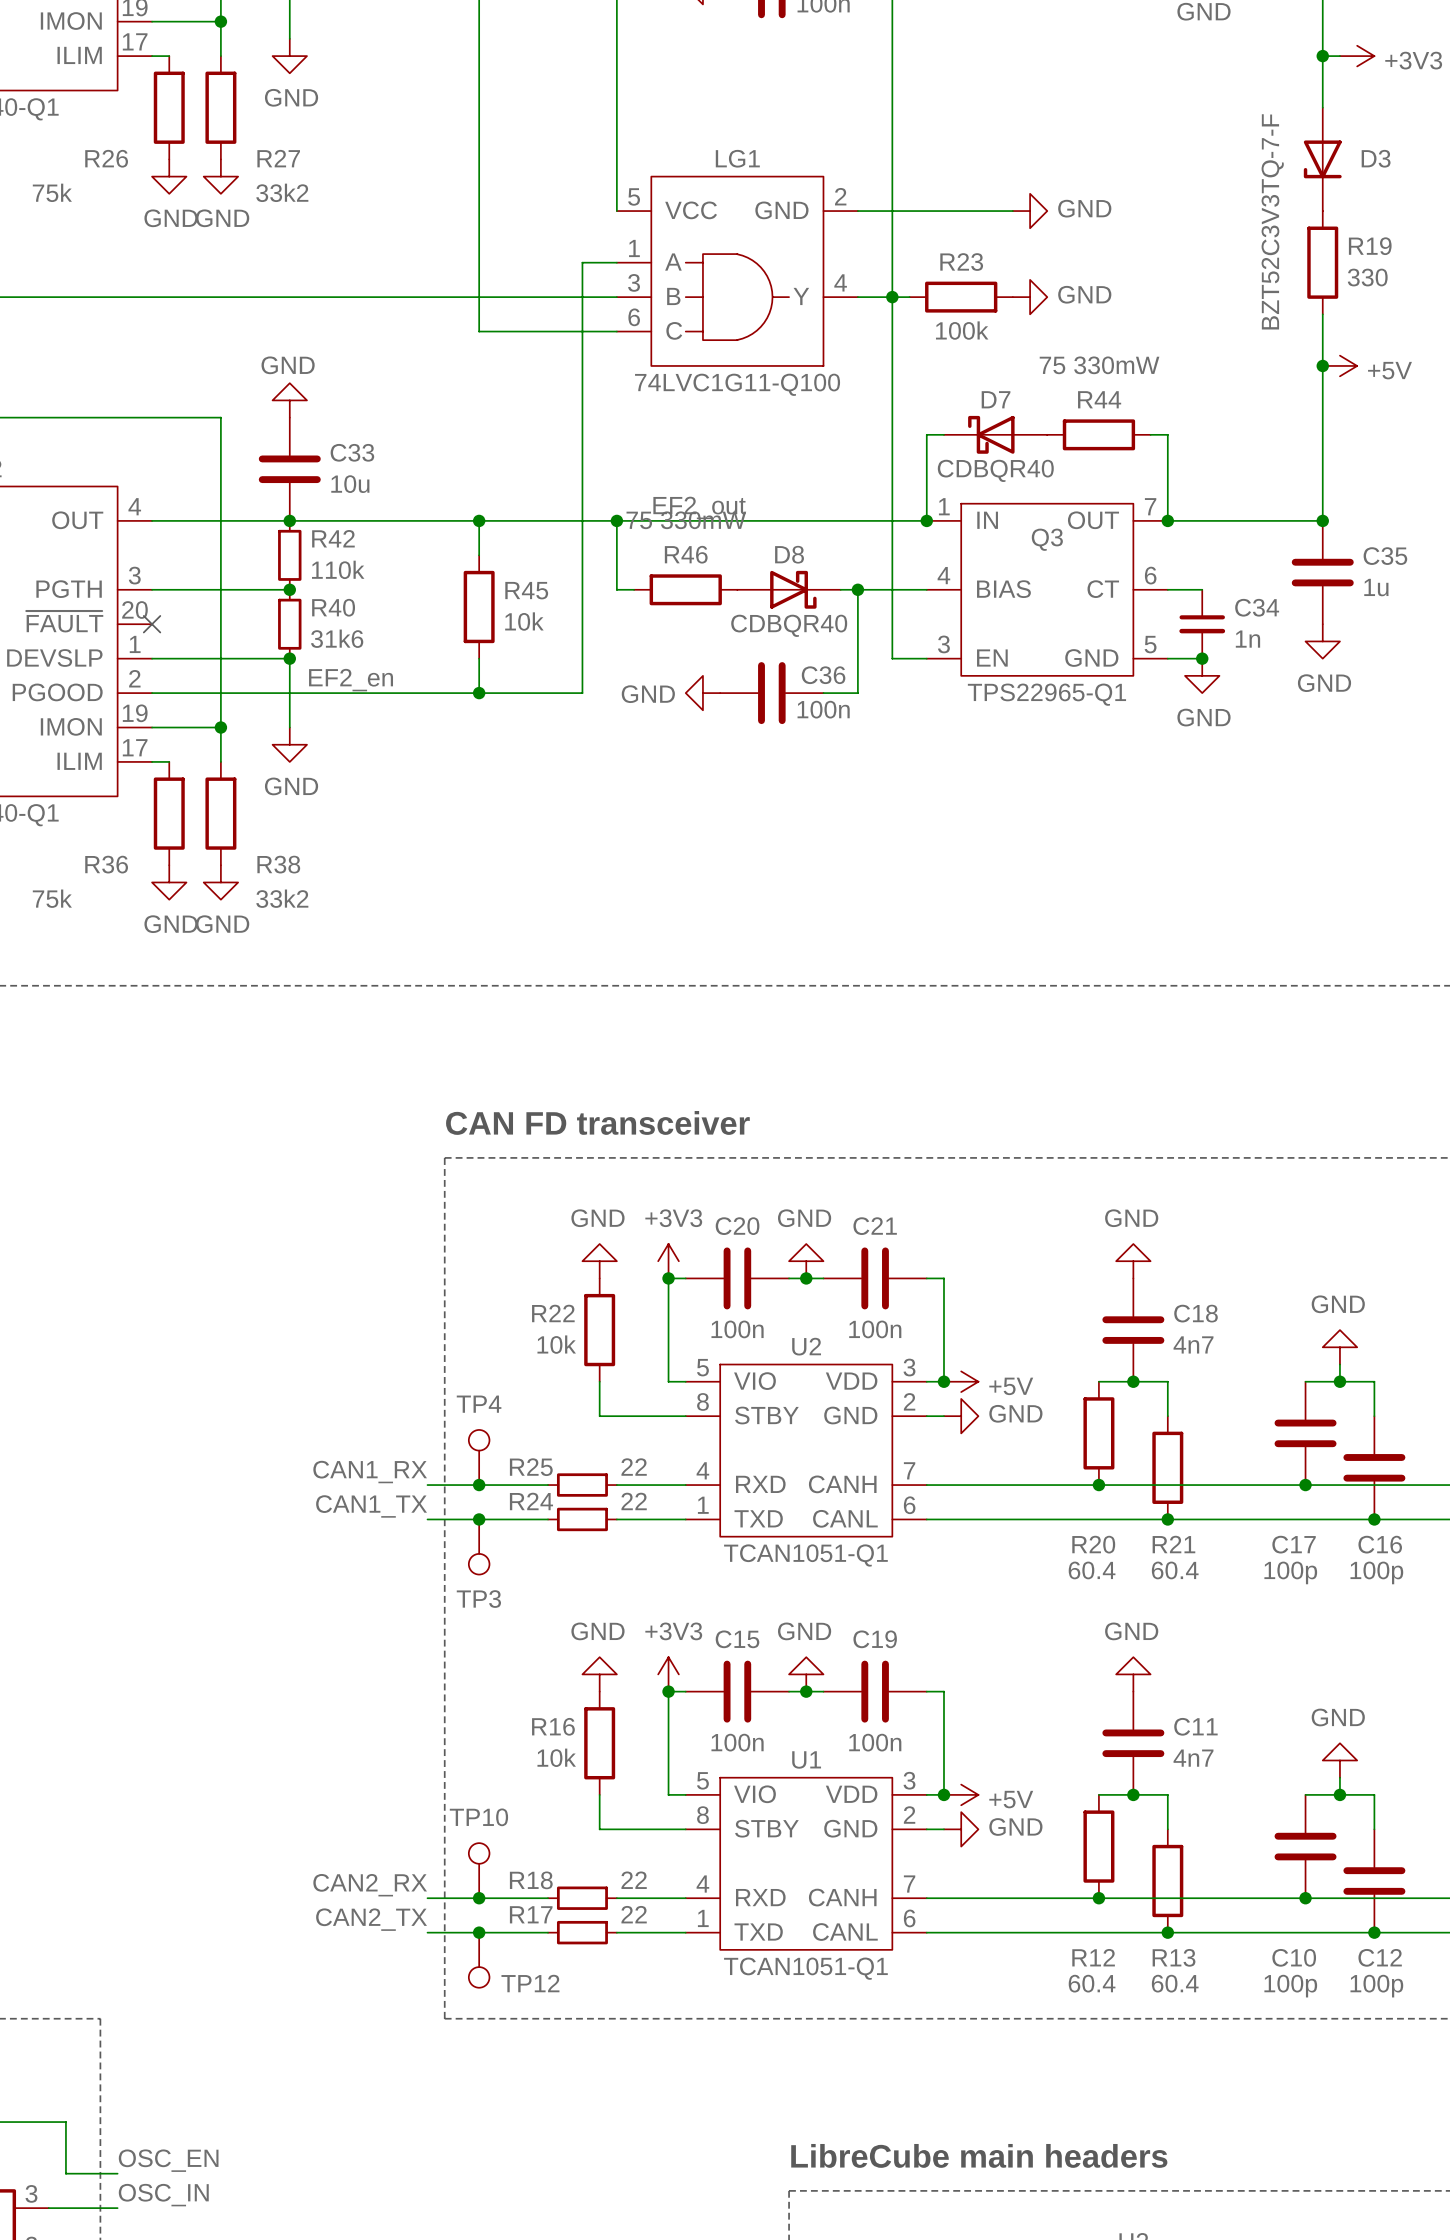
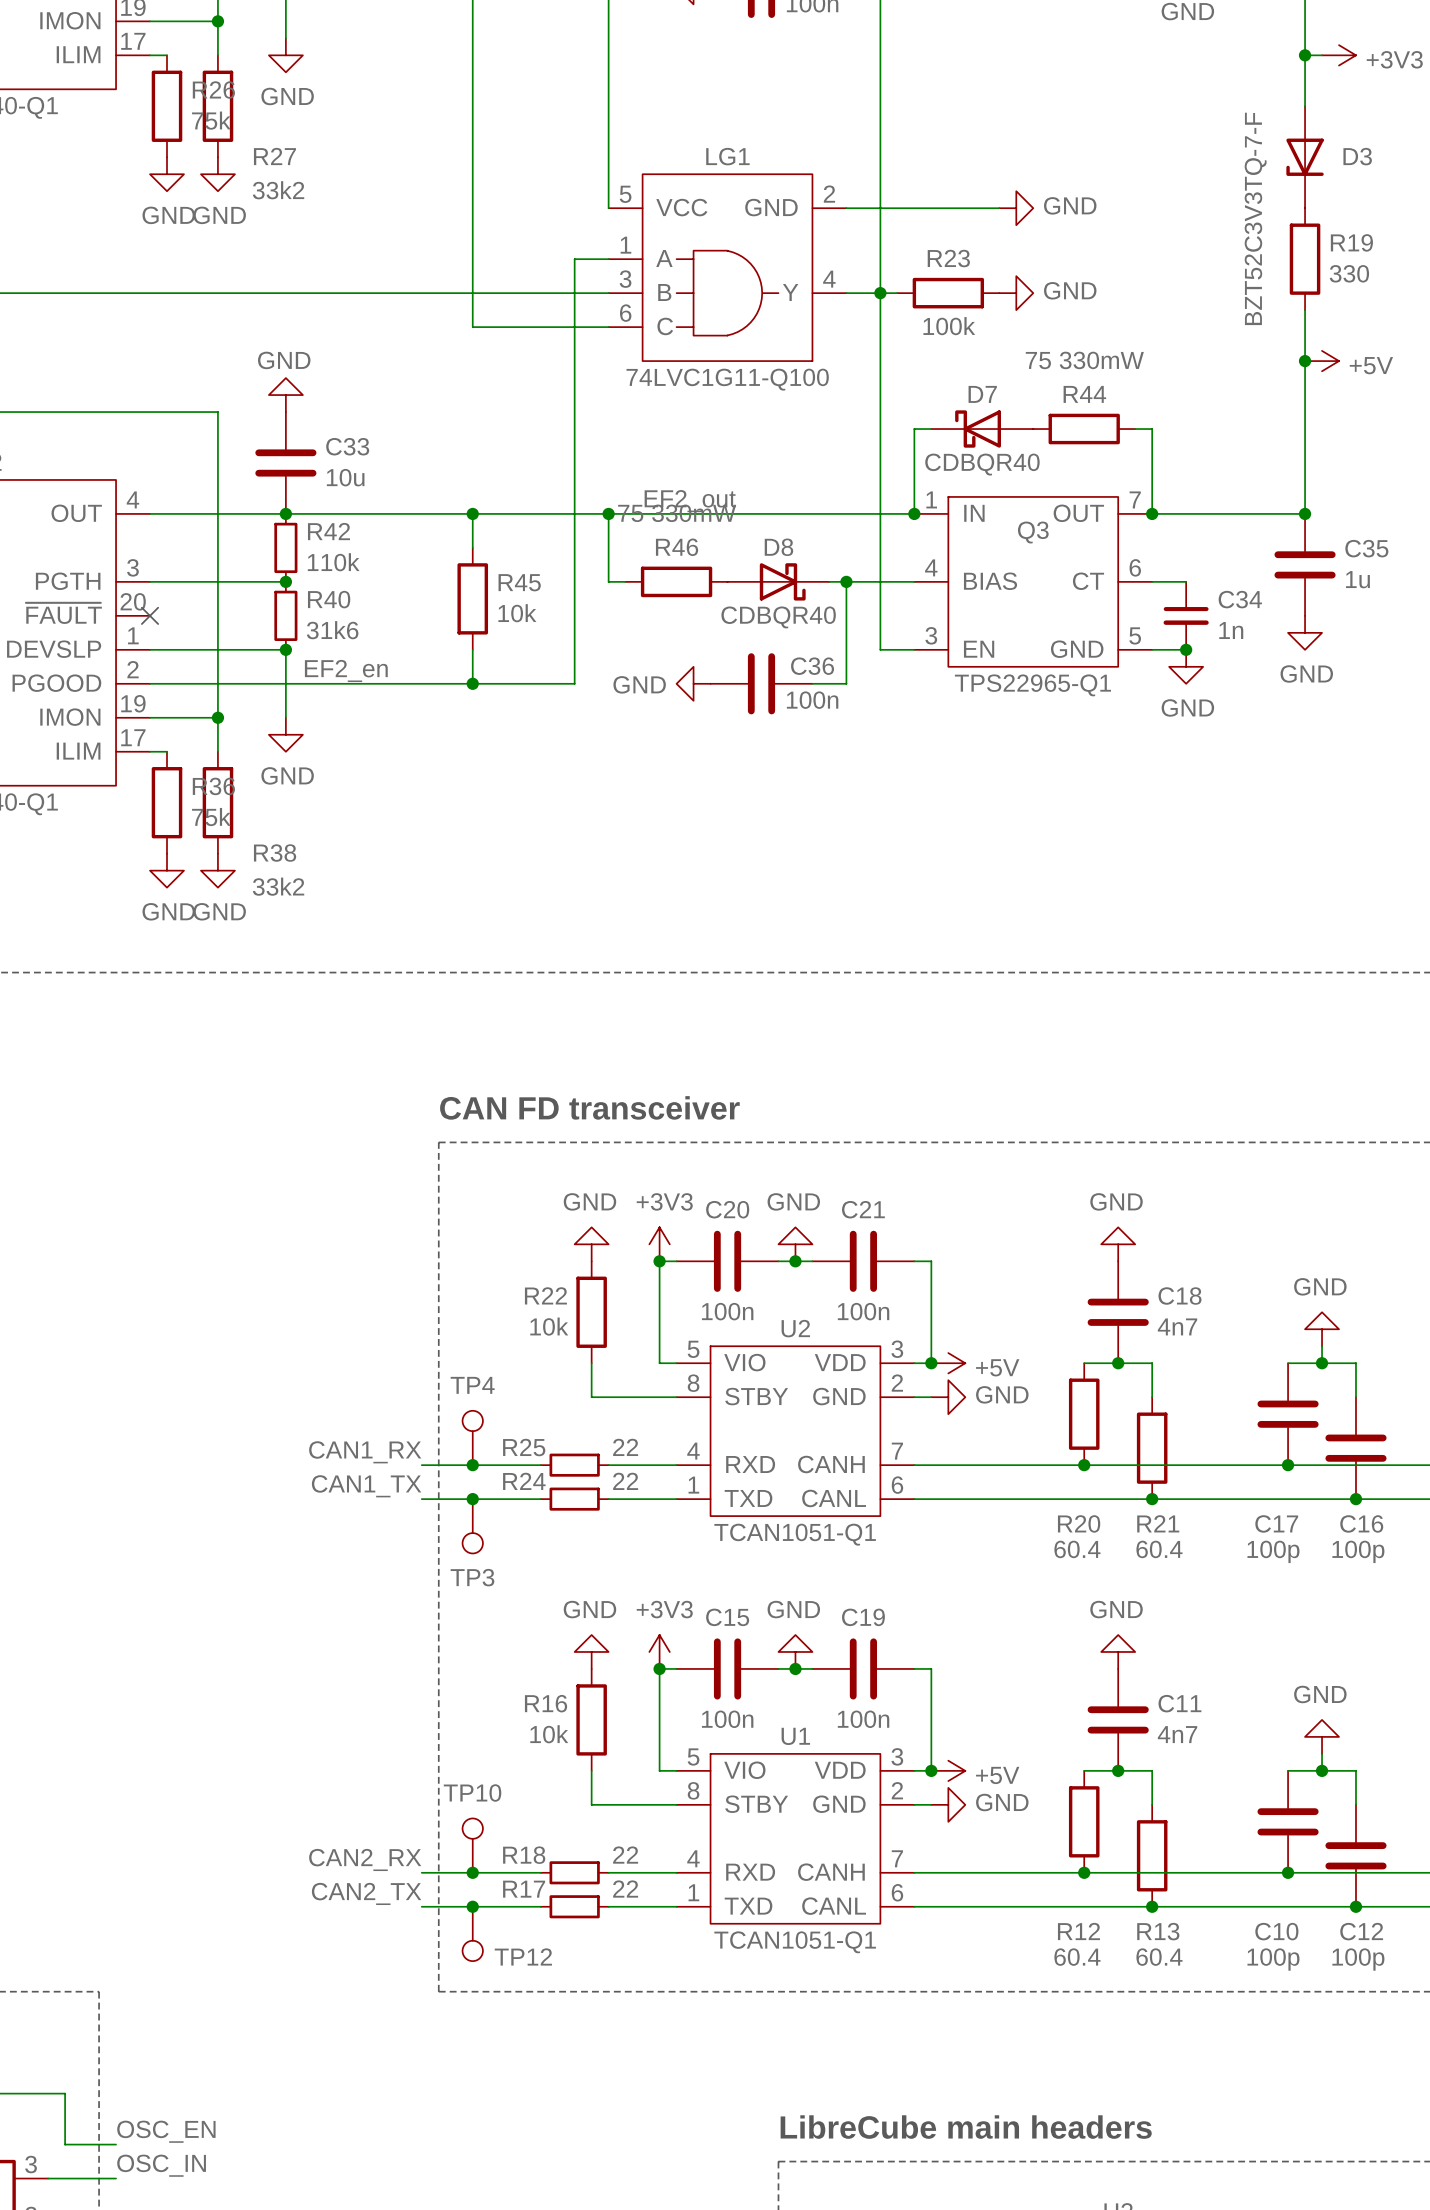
R26 name position: R26 (106, 158) -> R26 (213, 90)
R26 value position: 75k (52, 192) -> 75k (211, 120)
R36 name position: R36 (106, 864) -> R36 (213, 786)
R36 value position: 75k (52, 898) -> 75k (211, 817)

